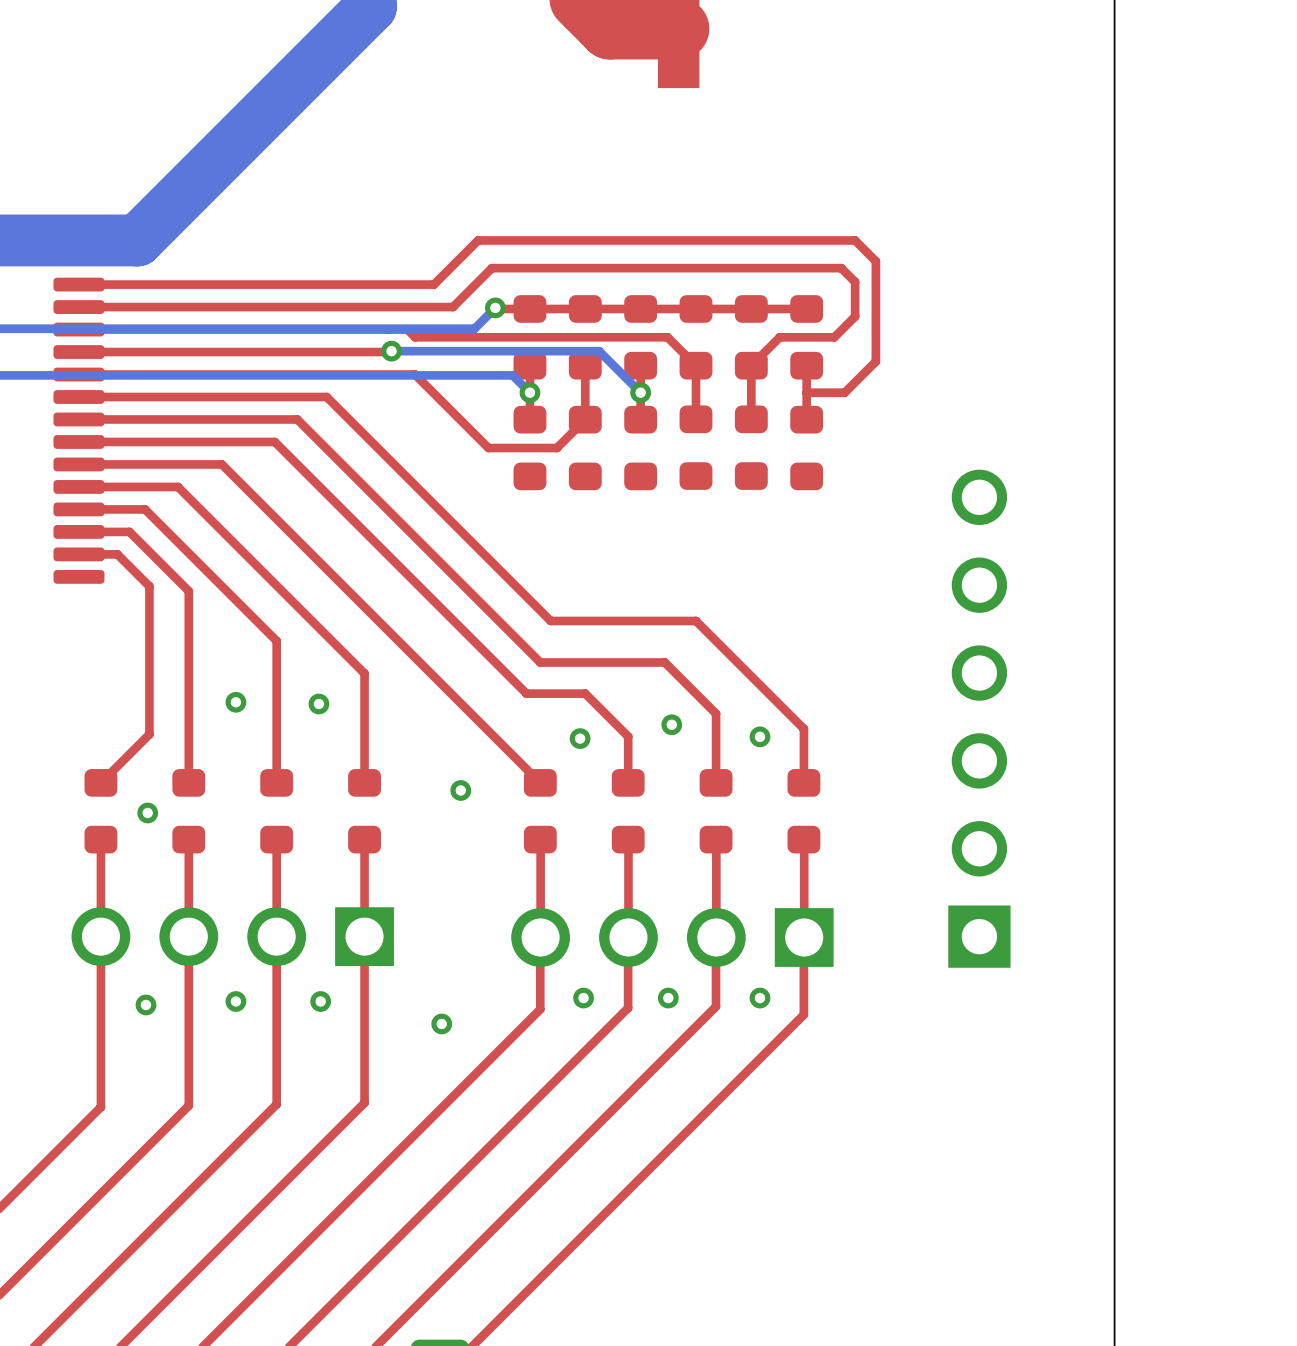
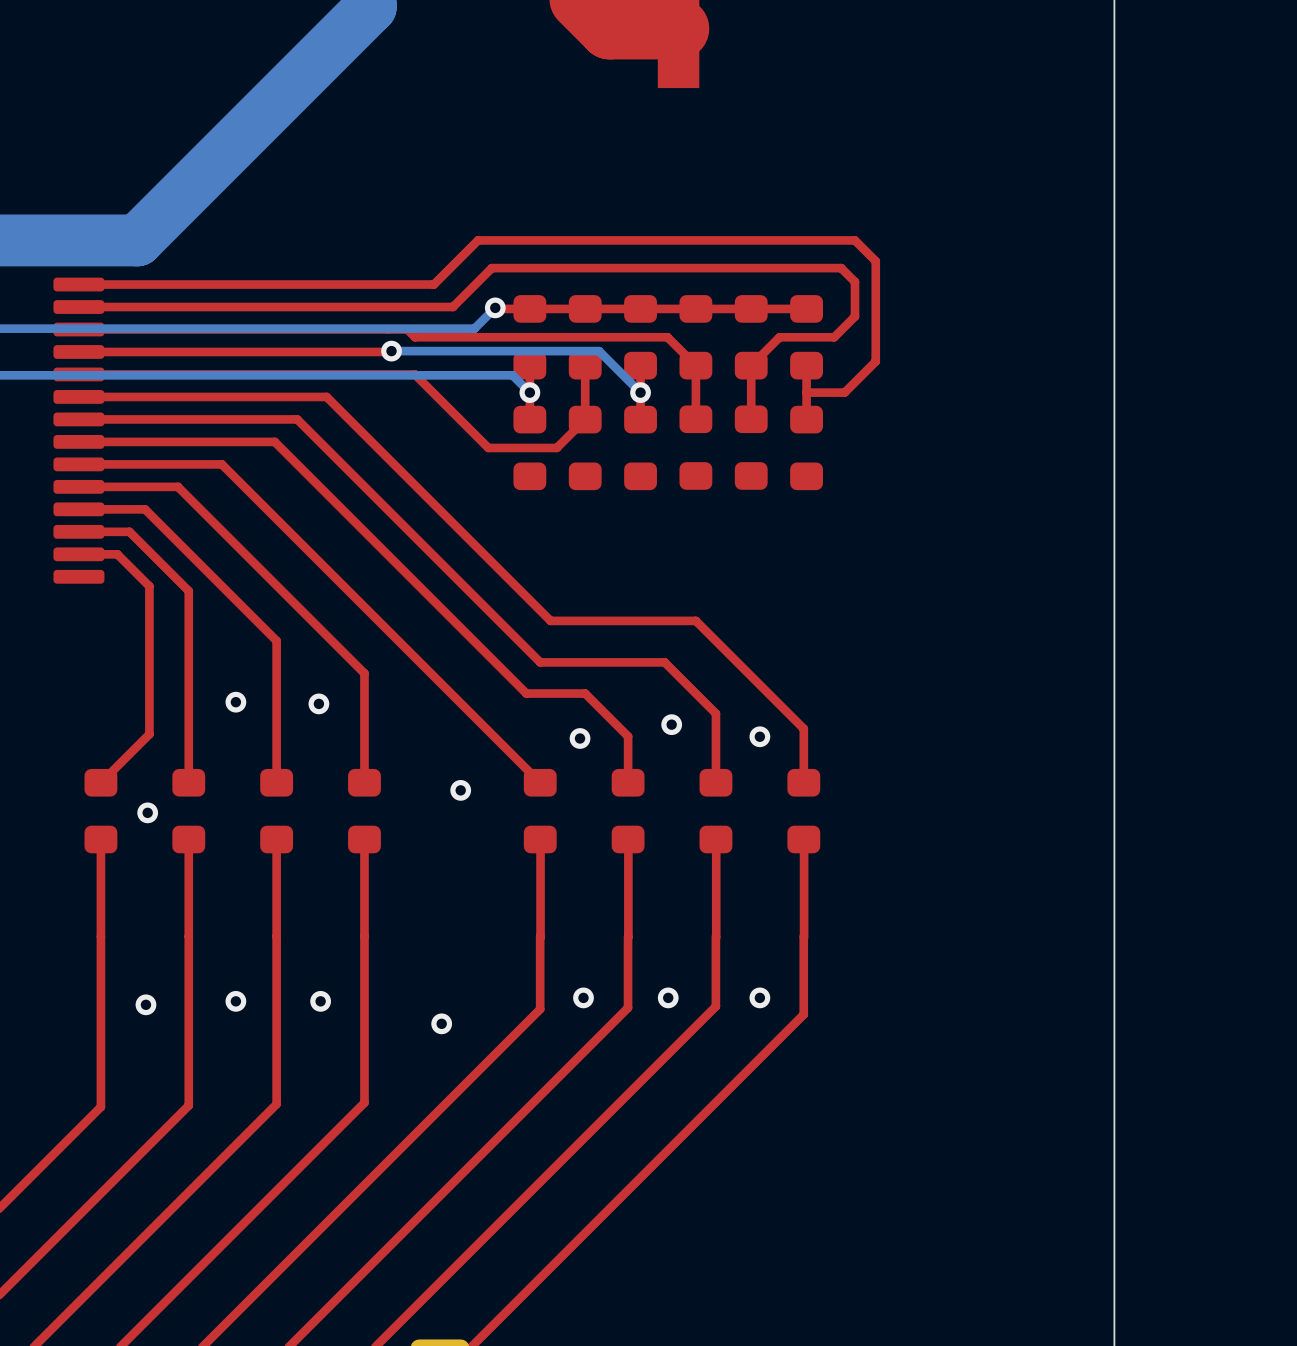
part: (979, 718) -> none
part: (232, 936) -> none
part: (672, 937) -> none

